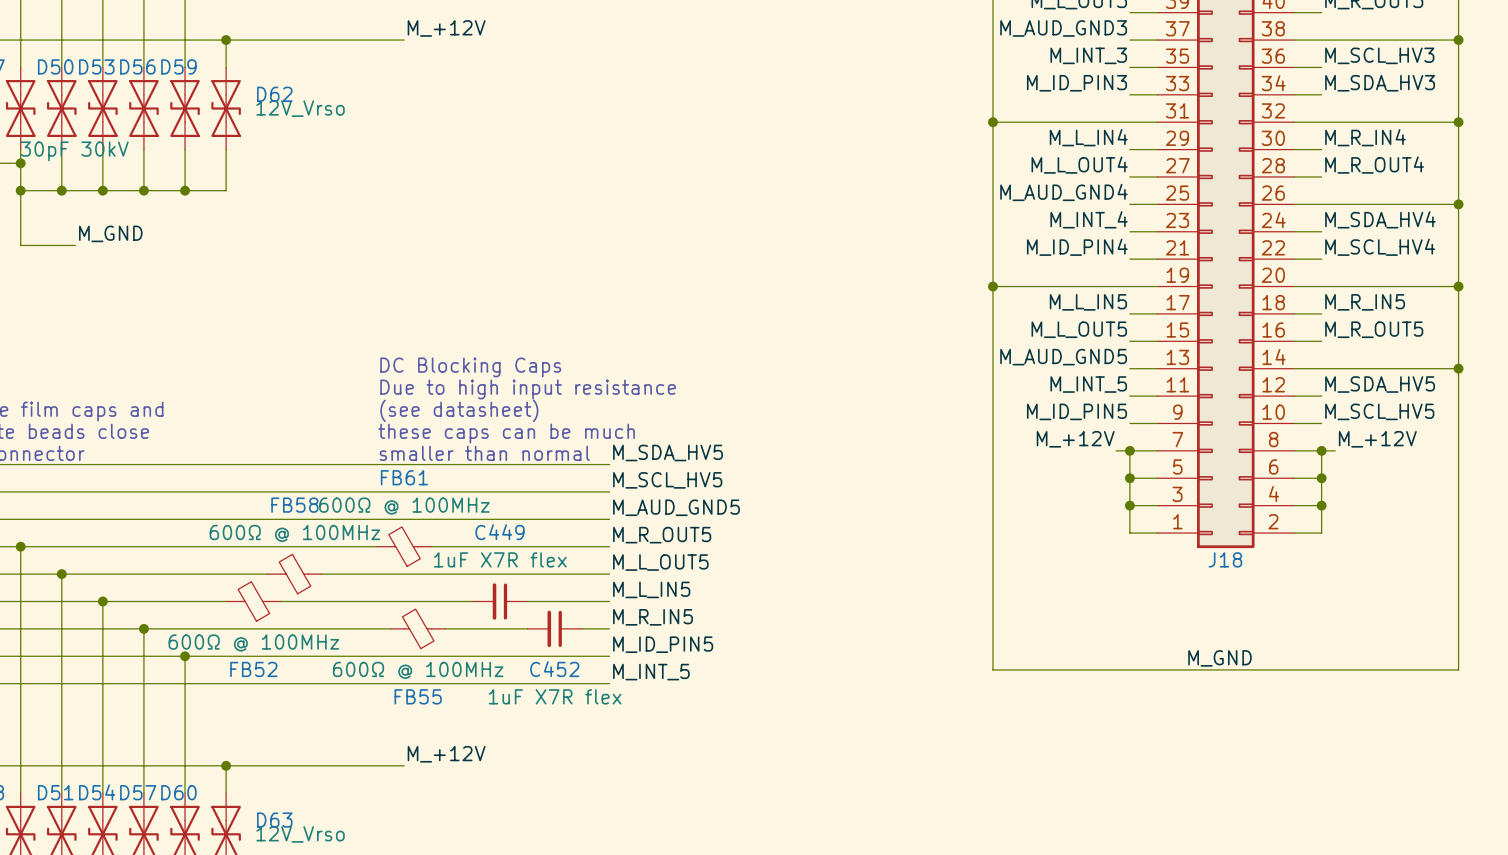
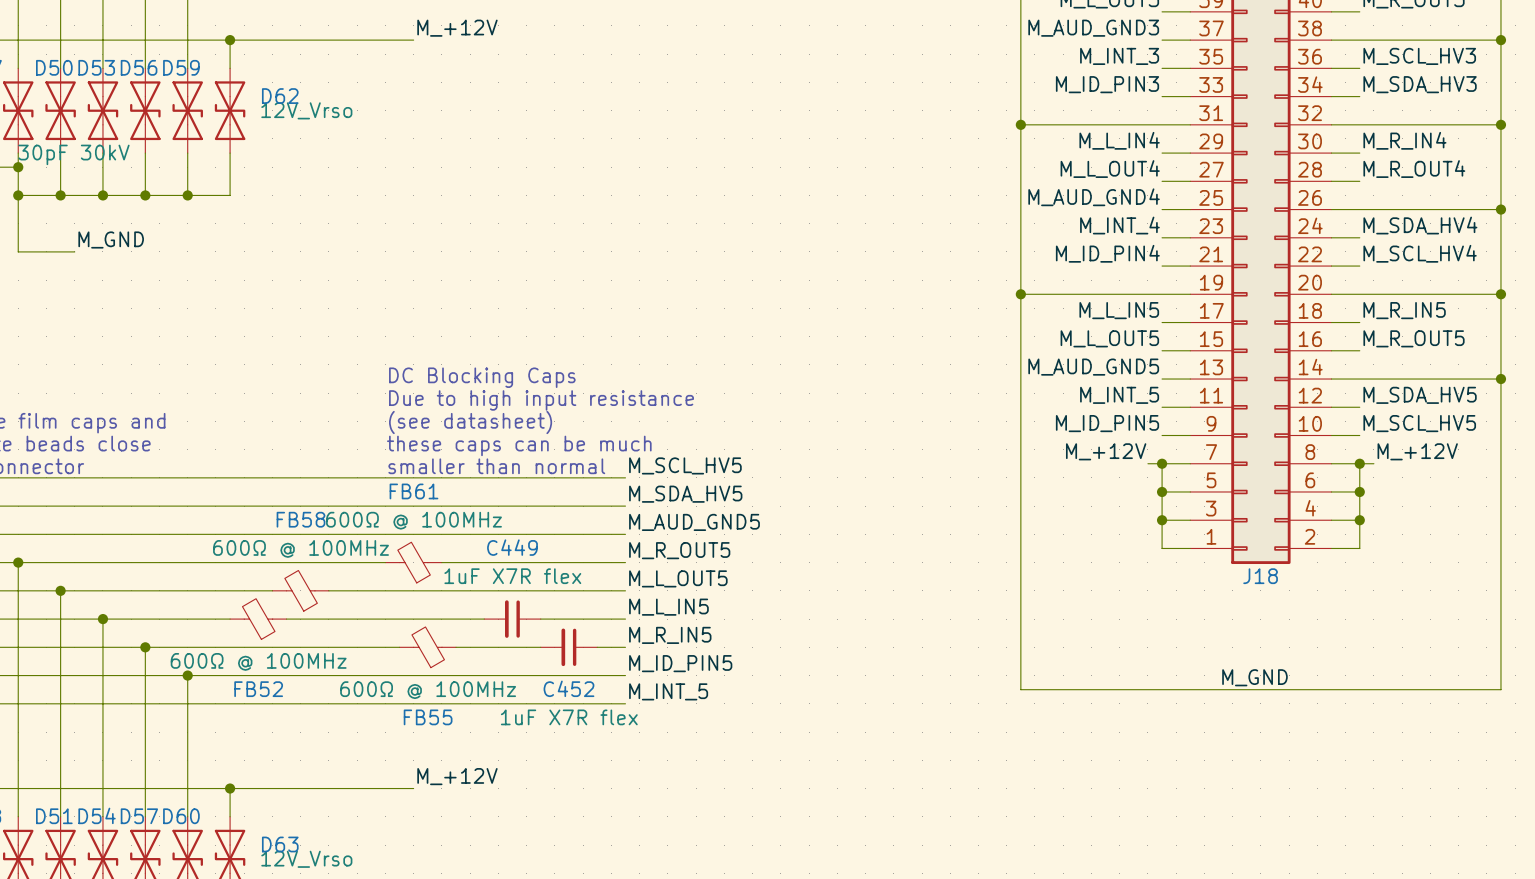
label: M_SDA_HV5 (668, 452) -> M_SCL_HV5 (685, 465)
label: M_SCL_HV5 (667, 480) -> M_SDA_HV5 (685, 494)

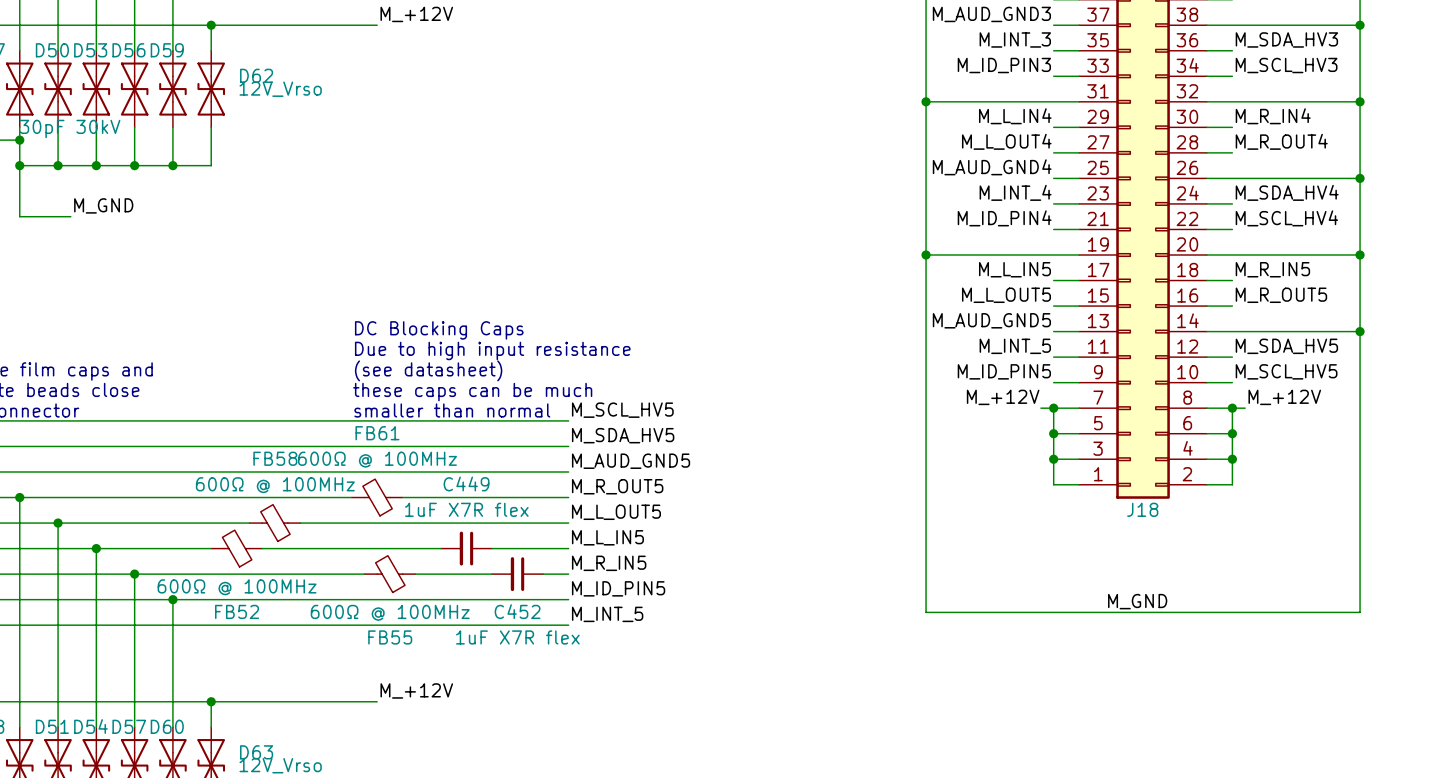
label: M_SCL_HV3 (1419, 56) -> M_SDA_HV3 (1286, 39)
label: M_SDA_HV3 (1420, 84) -> M_SCL_HV3 (1286, 65)

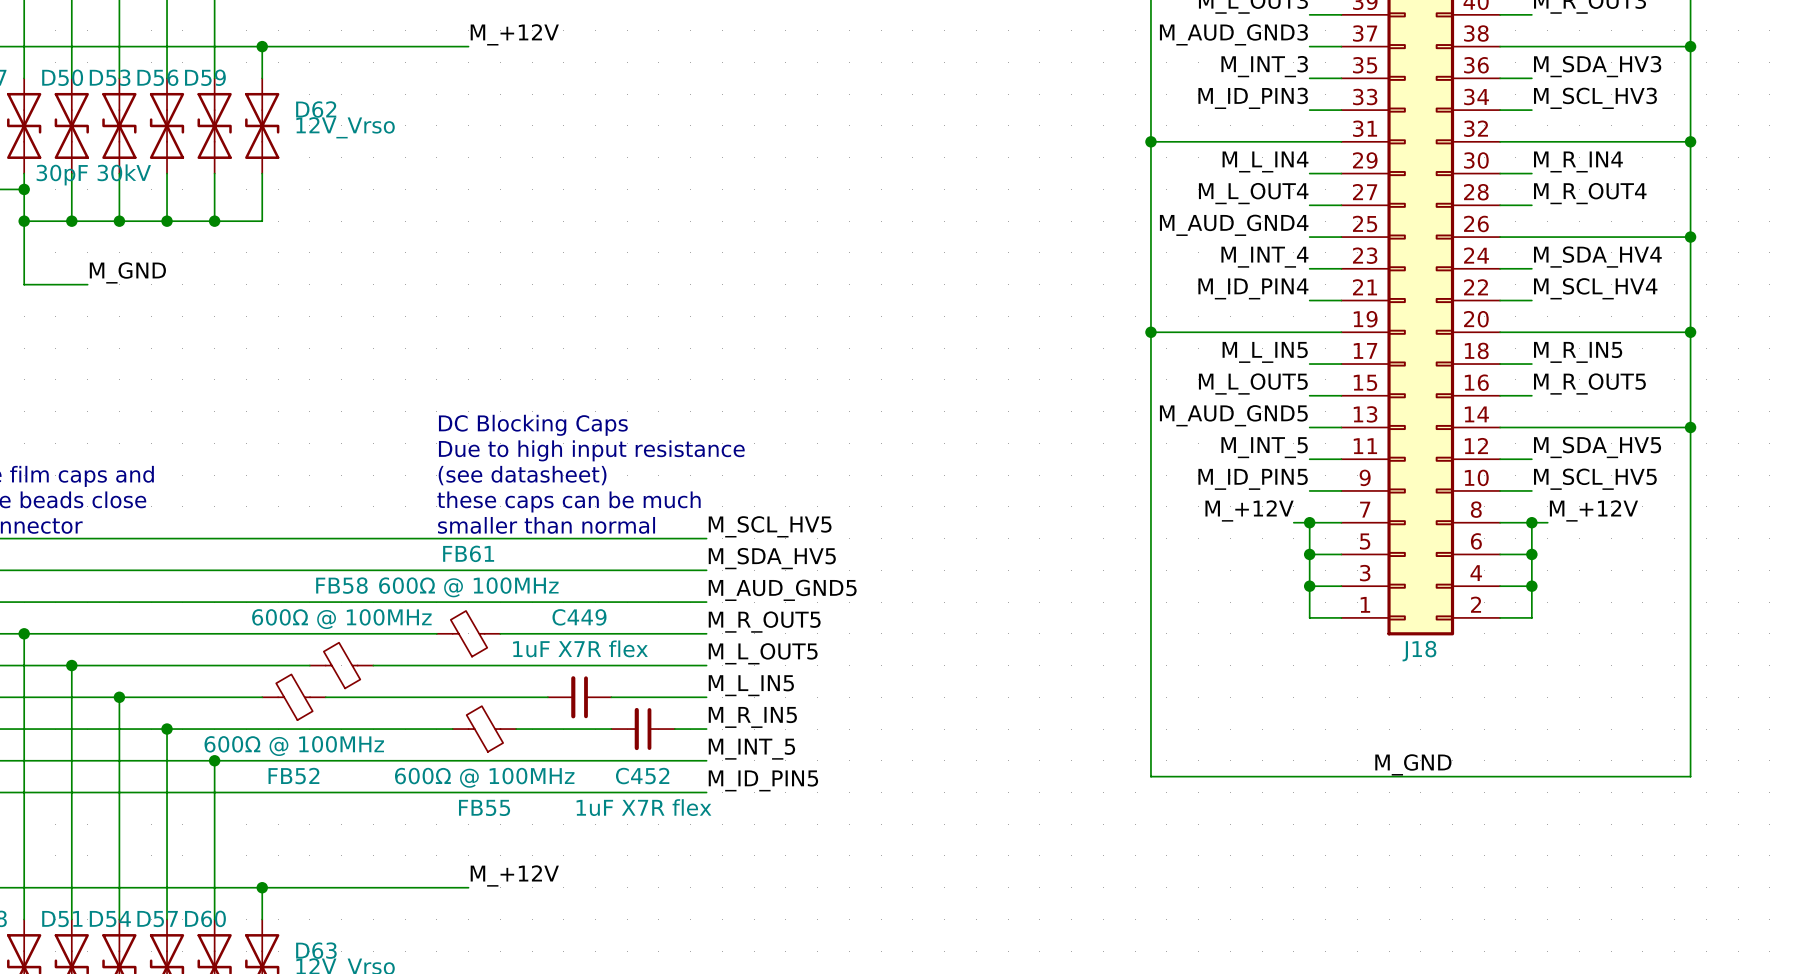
label: M_ID_PIN5 (618, 588) -> M_INT_5 (751, 749)
label: M_INT_5 (607, 614) -> M_ID_PIN5 (763, 780)

